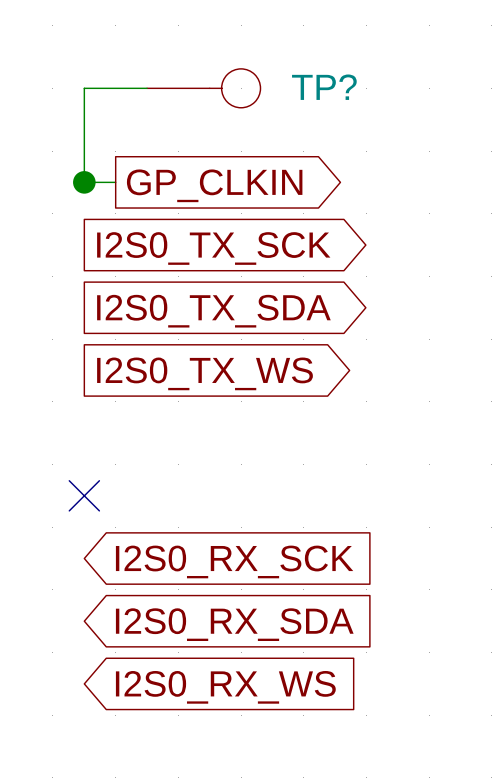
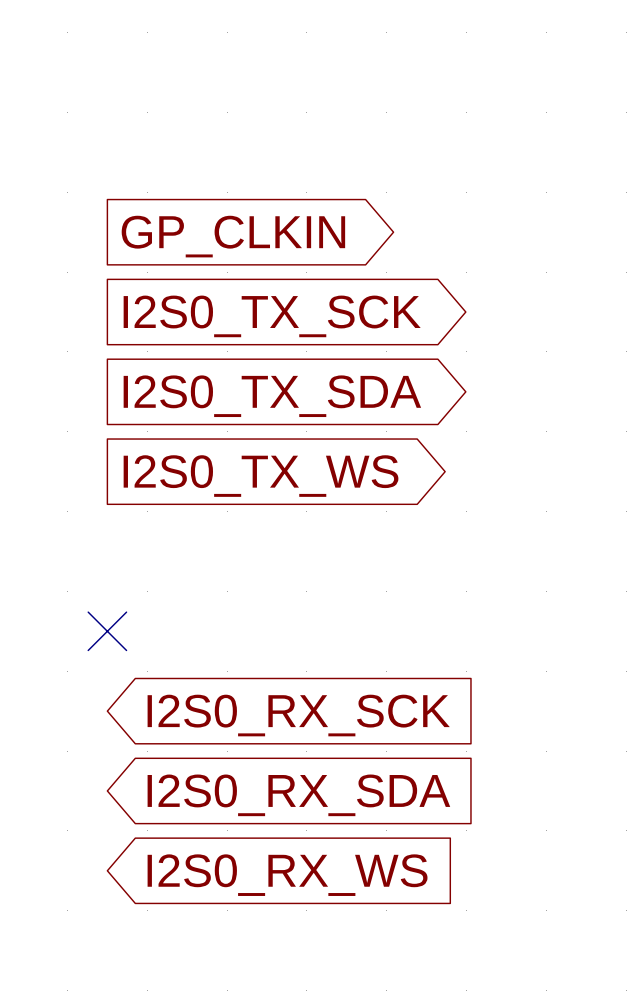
wire: (147, 88) (84, 88) (84, 182) (115, 182) -> none
TP?: (203, 88) -> none
junction: (84, 182) -> none
global label position: GP_CLKIN (214, 185) -> GP_CLKIN (233, 236)

